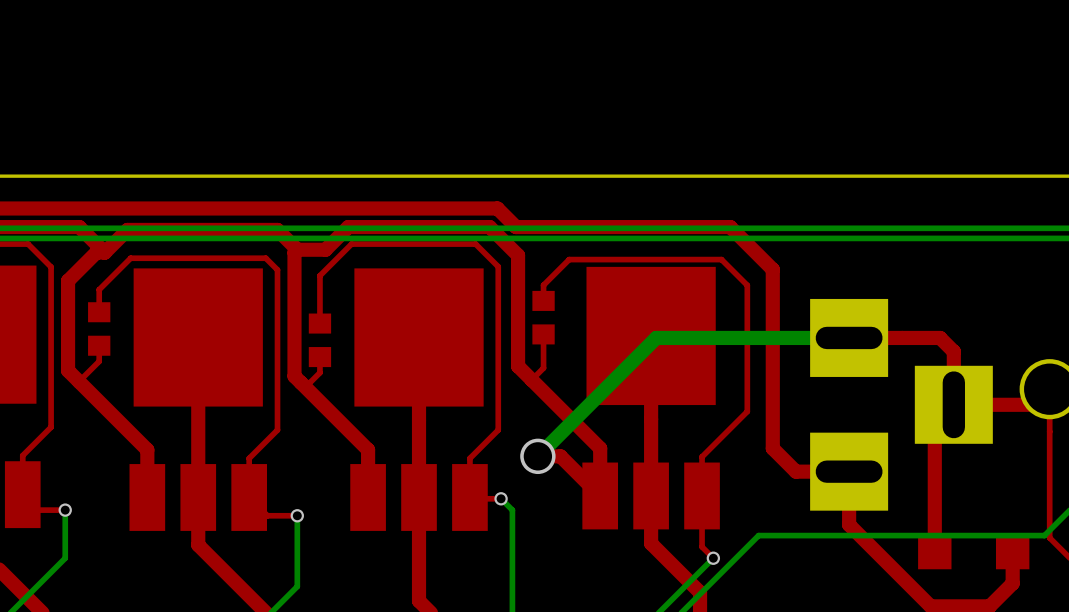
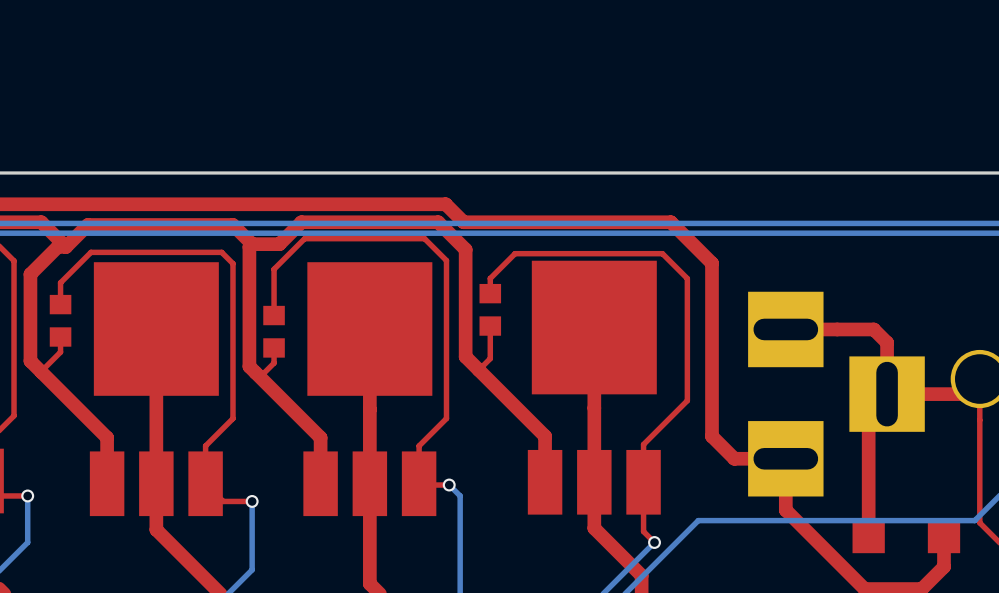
bottom track: (849, 337) (656, 337) (537, 456) -> none
top track: (537, 456) (560, 456) (600, 495) -> none
via: (537, 456) -> none

